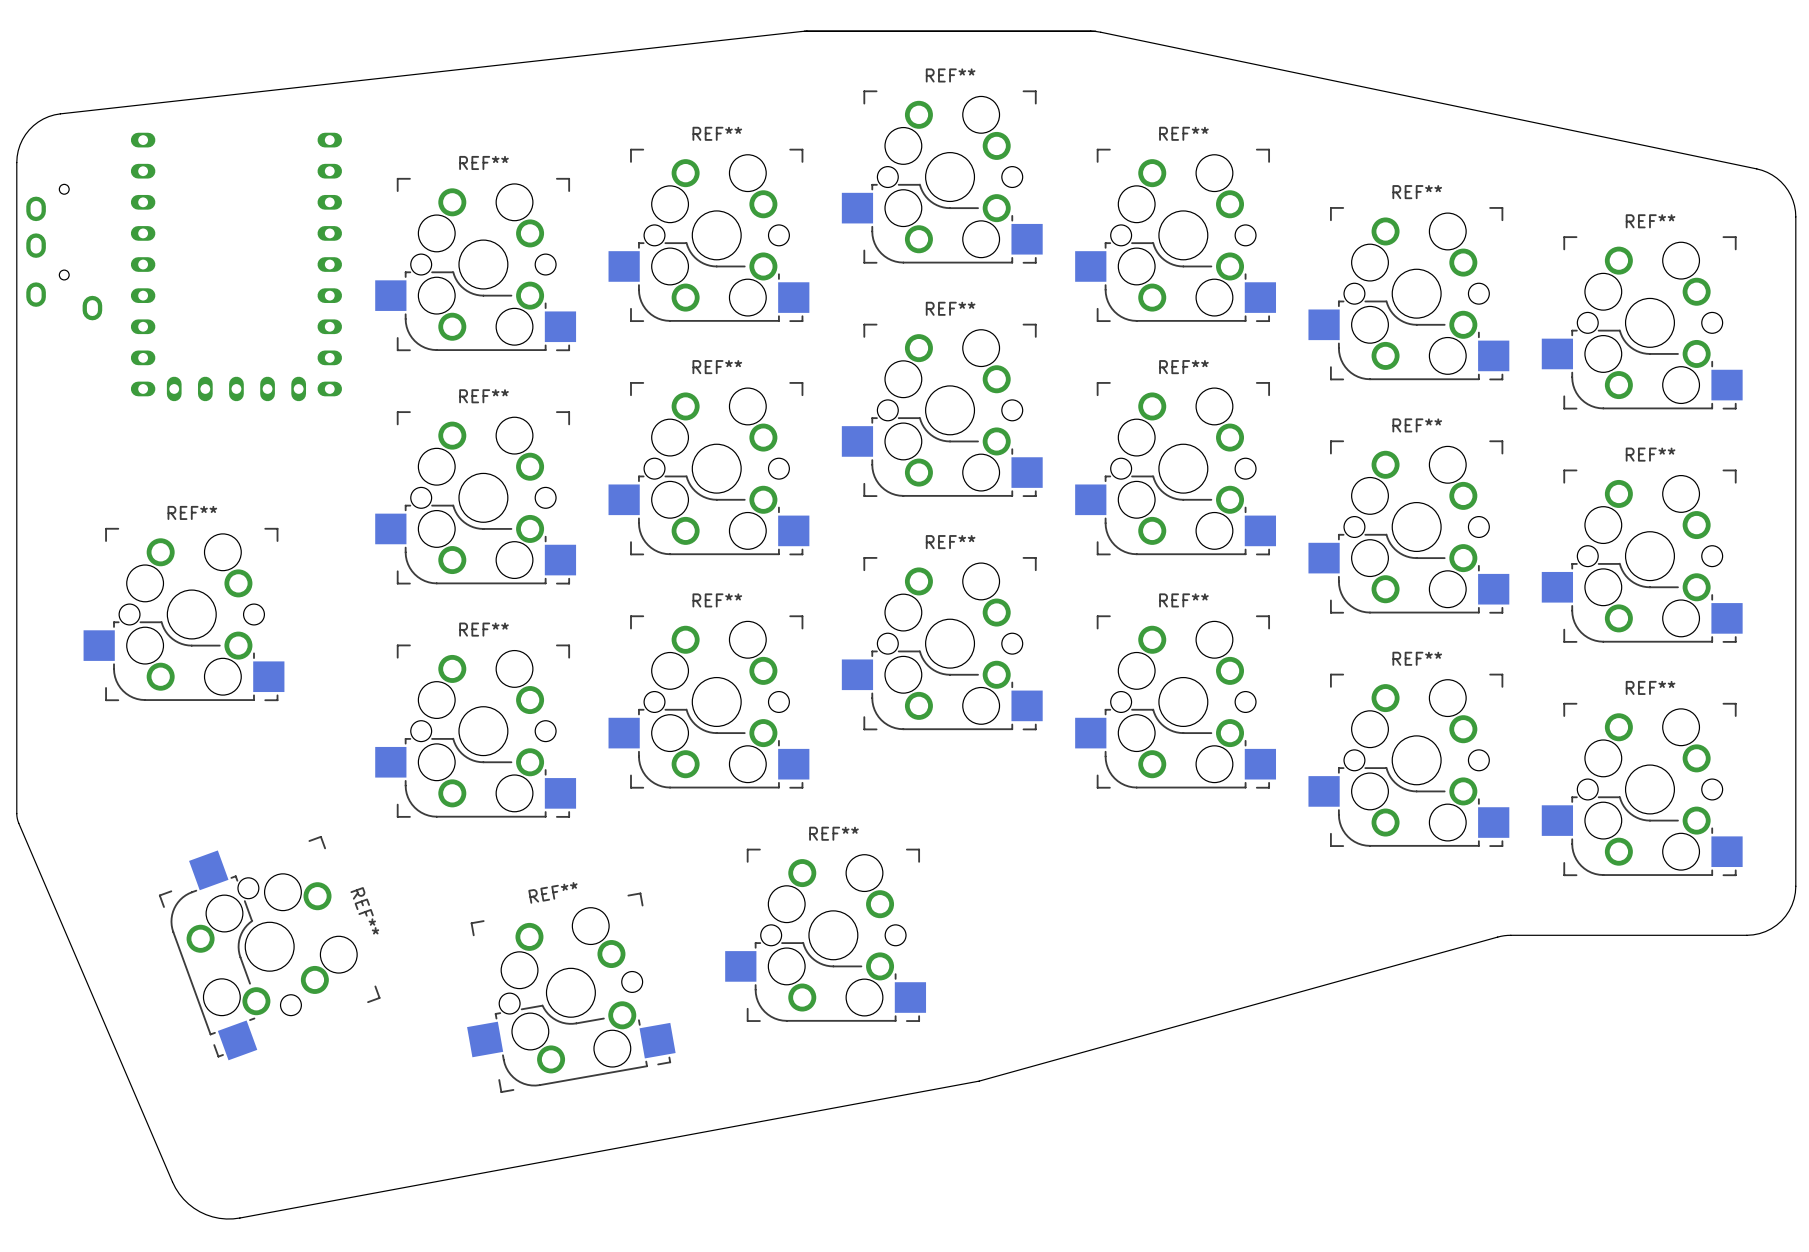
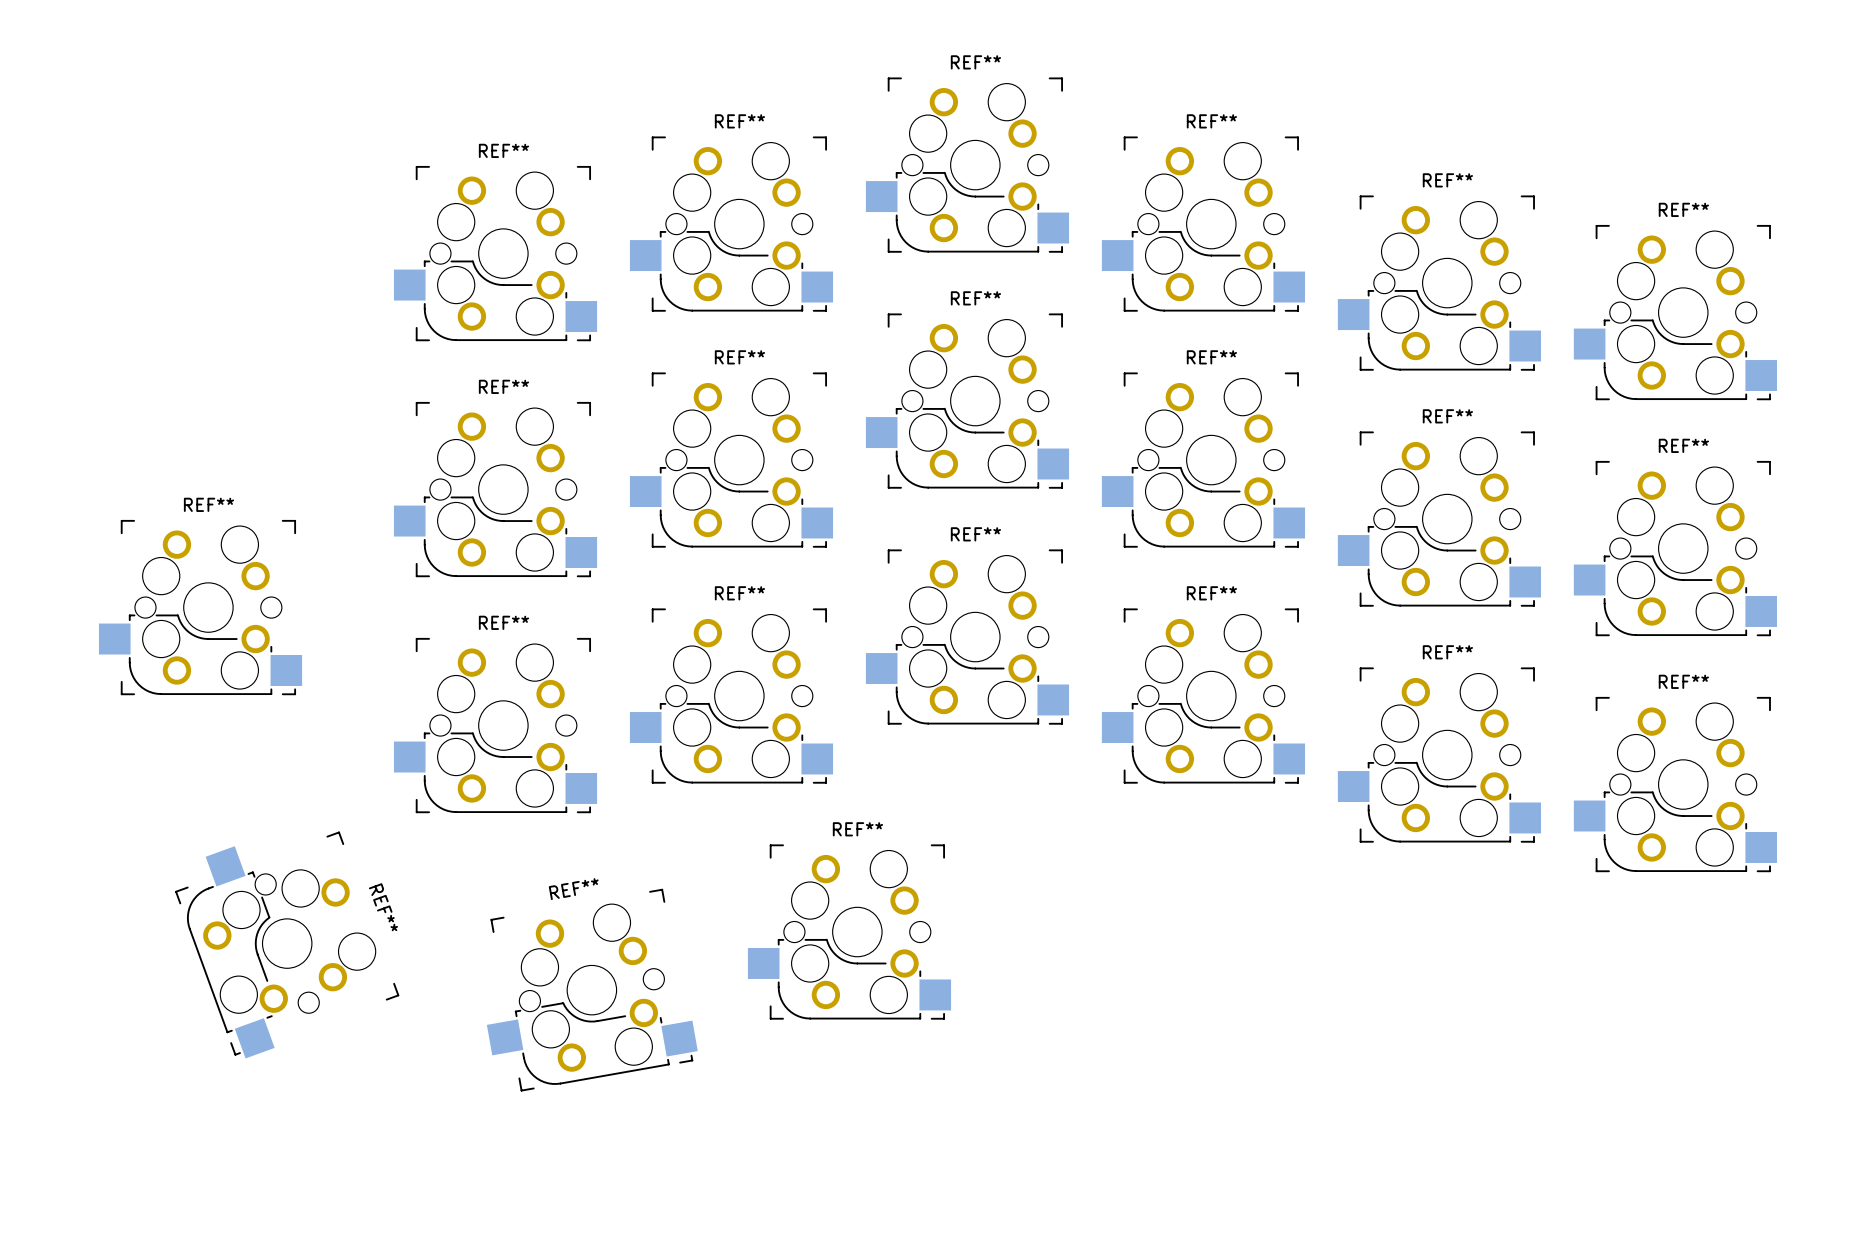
board edge: (1090, 31) (1756, 168) (1772, 175) (1784, 185) (1792, 200) (1795, 216) (1795, 886) (1792, 905) (1785, 916) (1771, 928) (1753, 934) (1500, 936) (979, 1081) (239, 1218) (219, 1218) (199, 1211) (183, 1199) (172, 1181) (17, 818) (16, 162) (22, 139) (38, 122) (60, 113) (806, 31) -> none
board edge: (1095, 31) (804, 31) -> none
part: (64, 252) -> none
part: (236, 266) -> none

